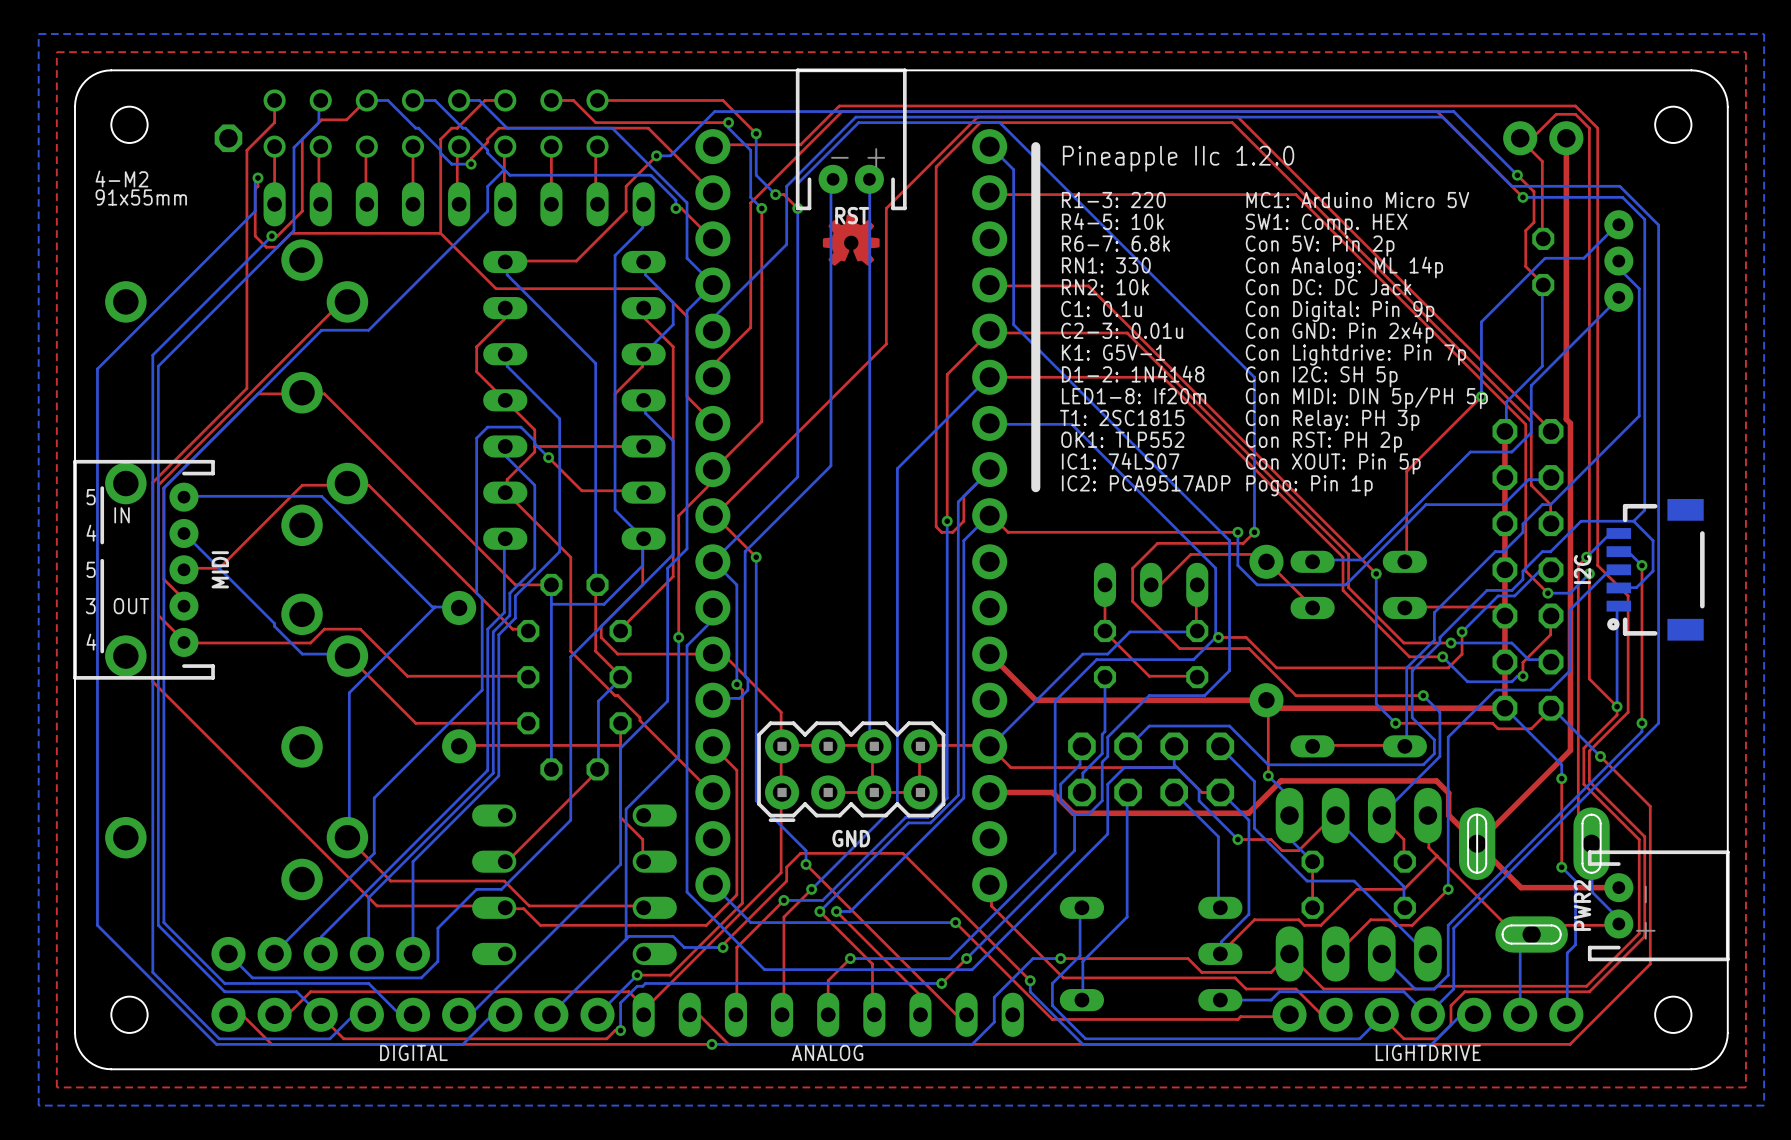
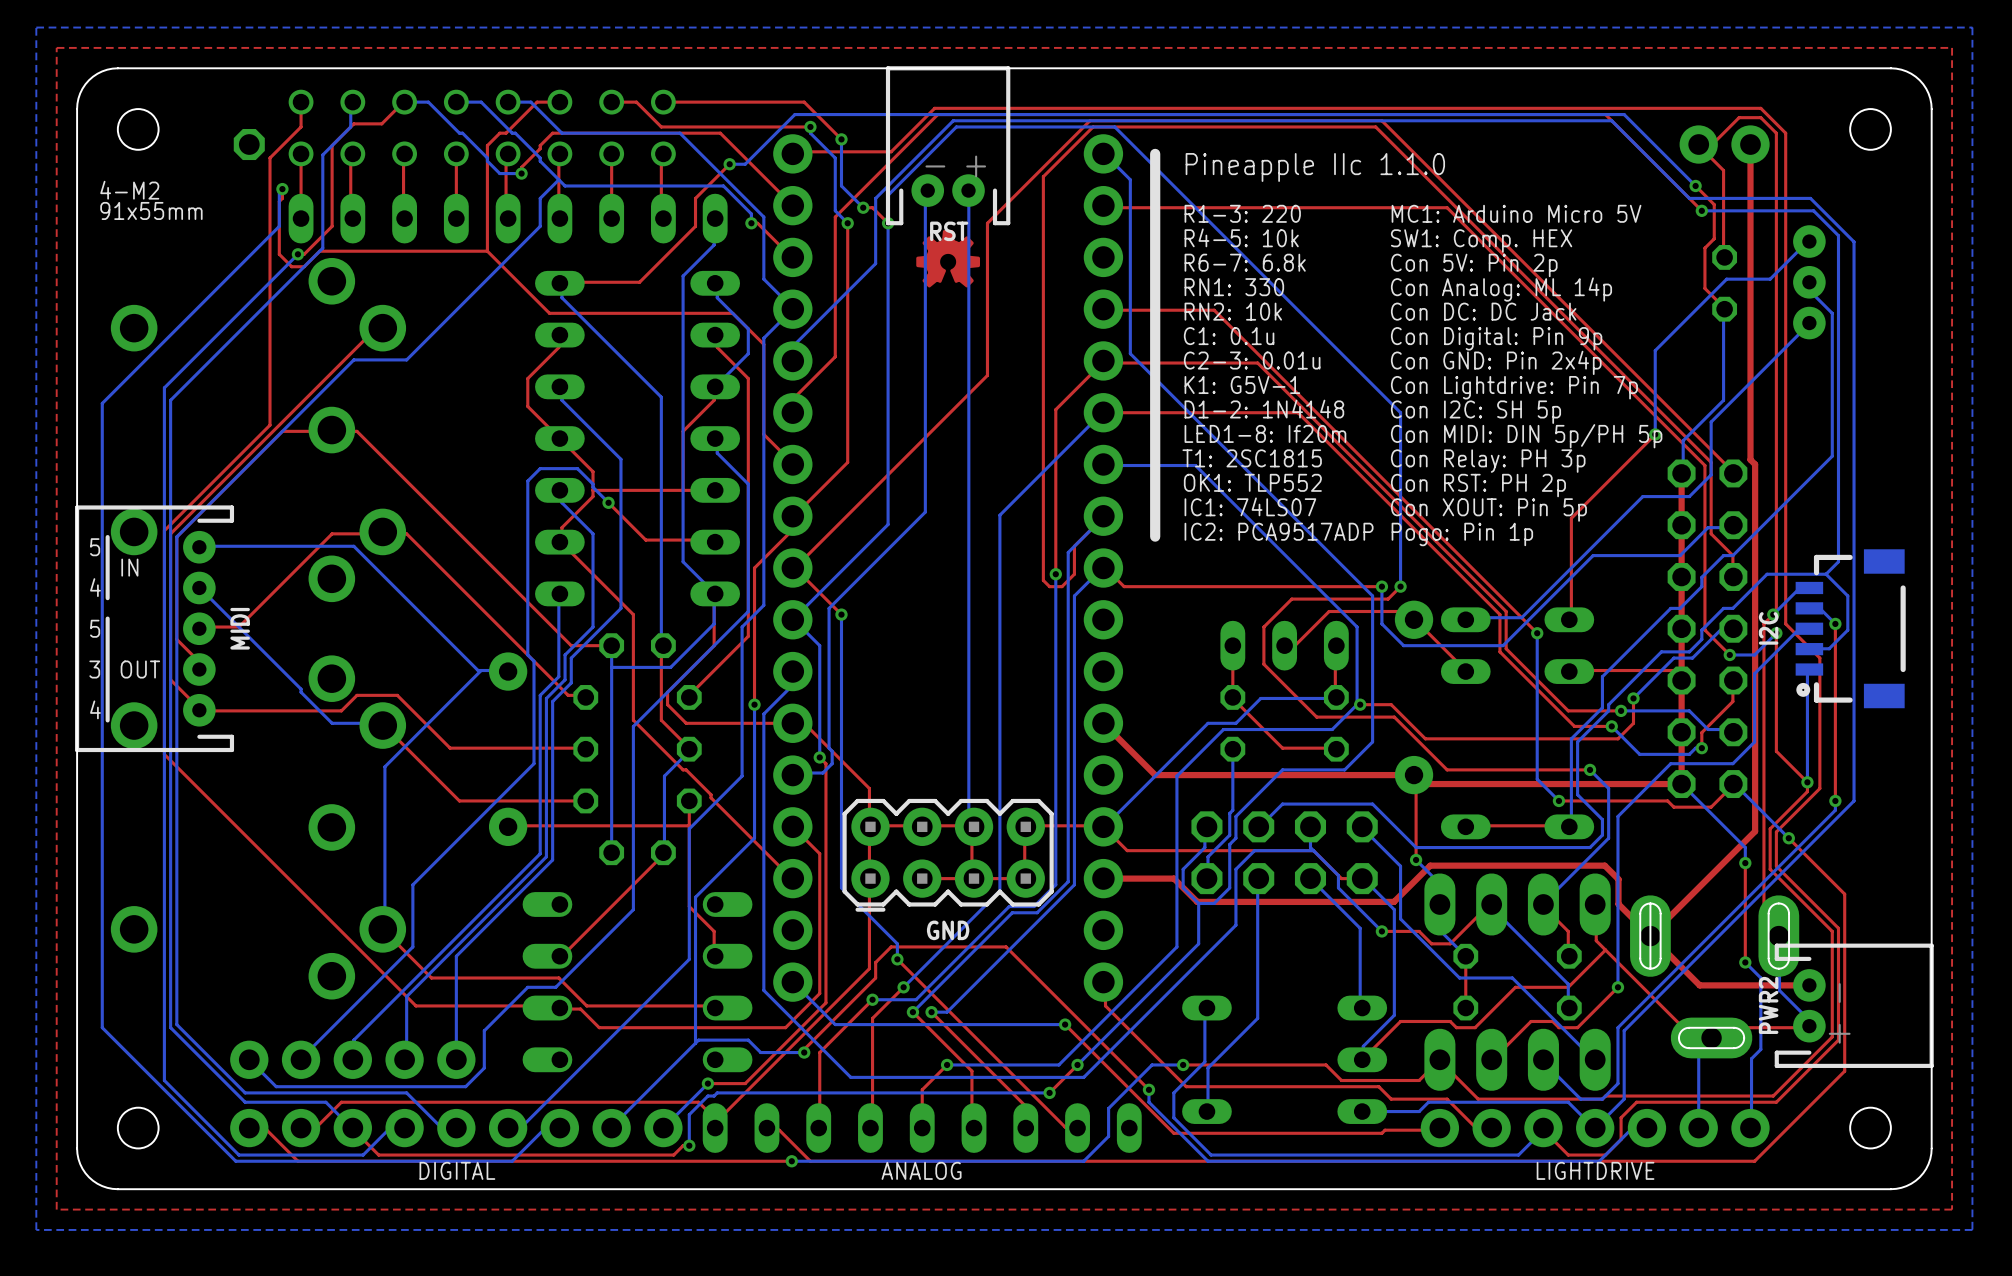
text: Pineapple IIc 1.2.0 (1178, 158) -> Pineapple IIc 1.1.0 (1315, 167)

